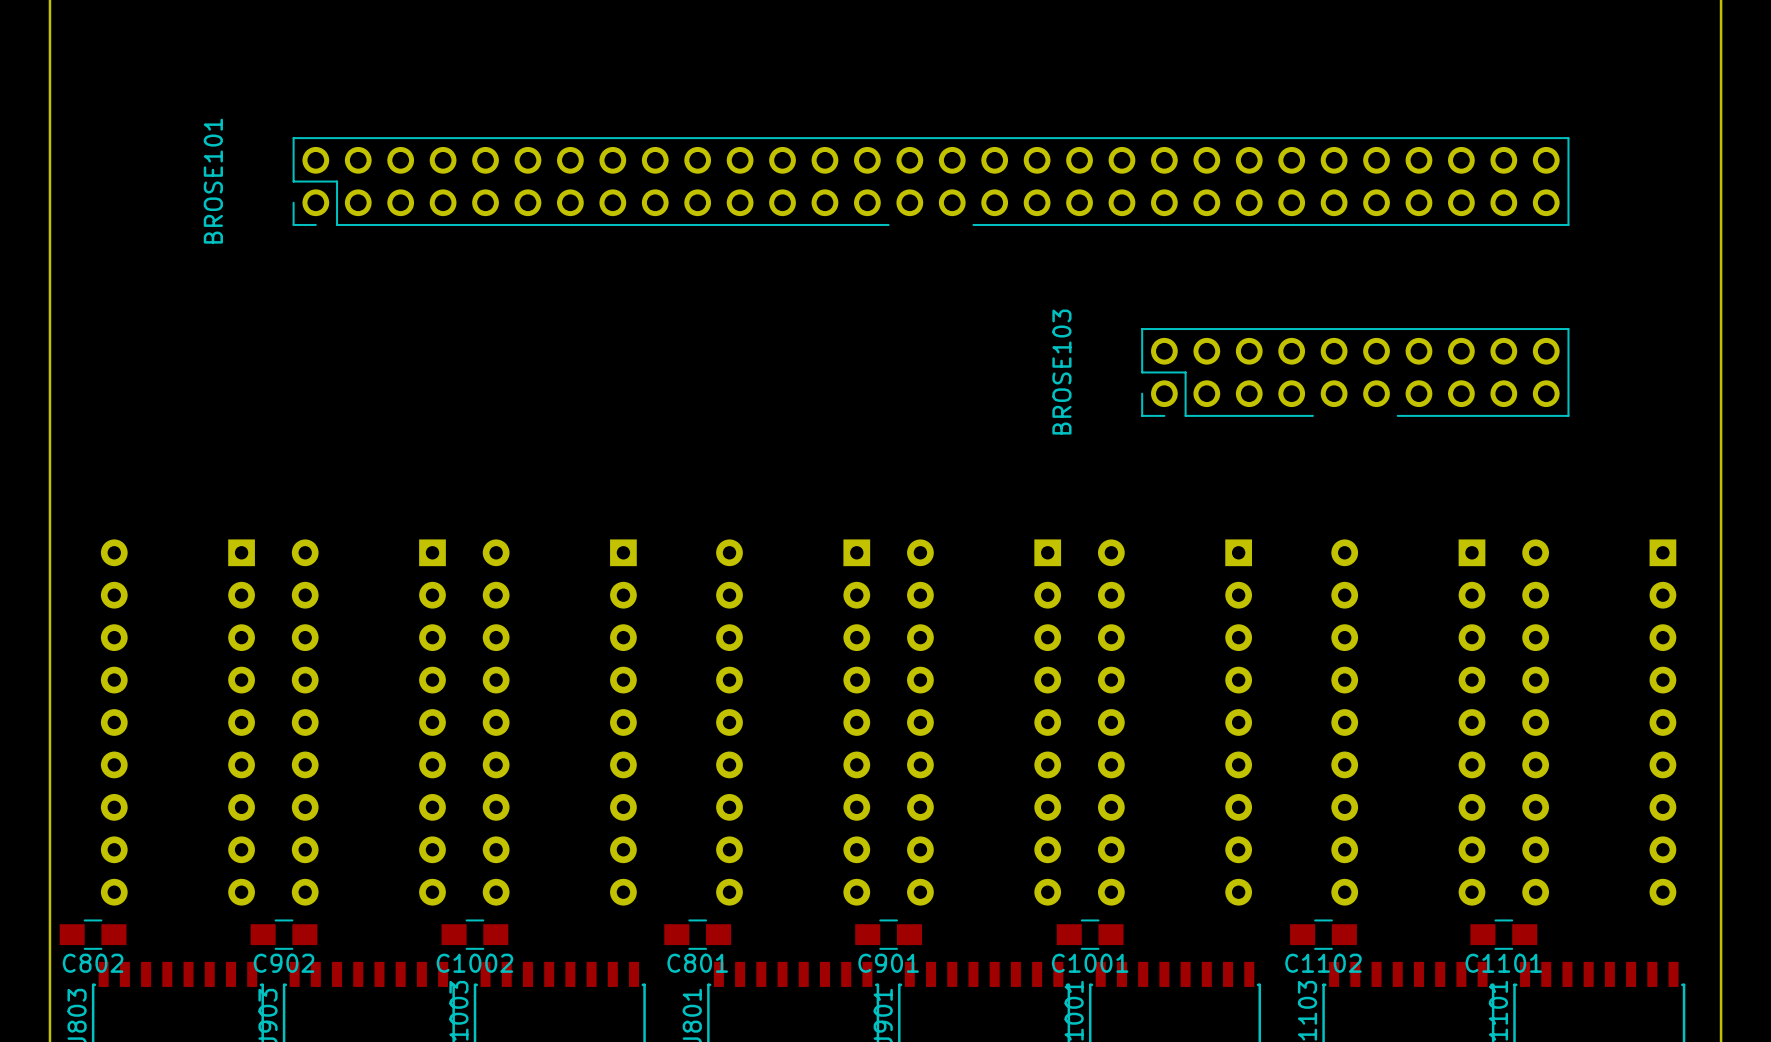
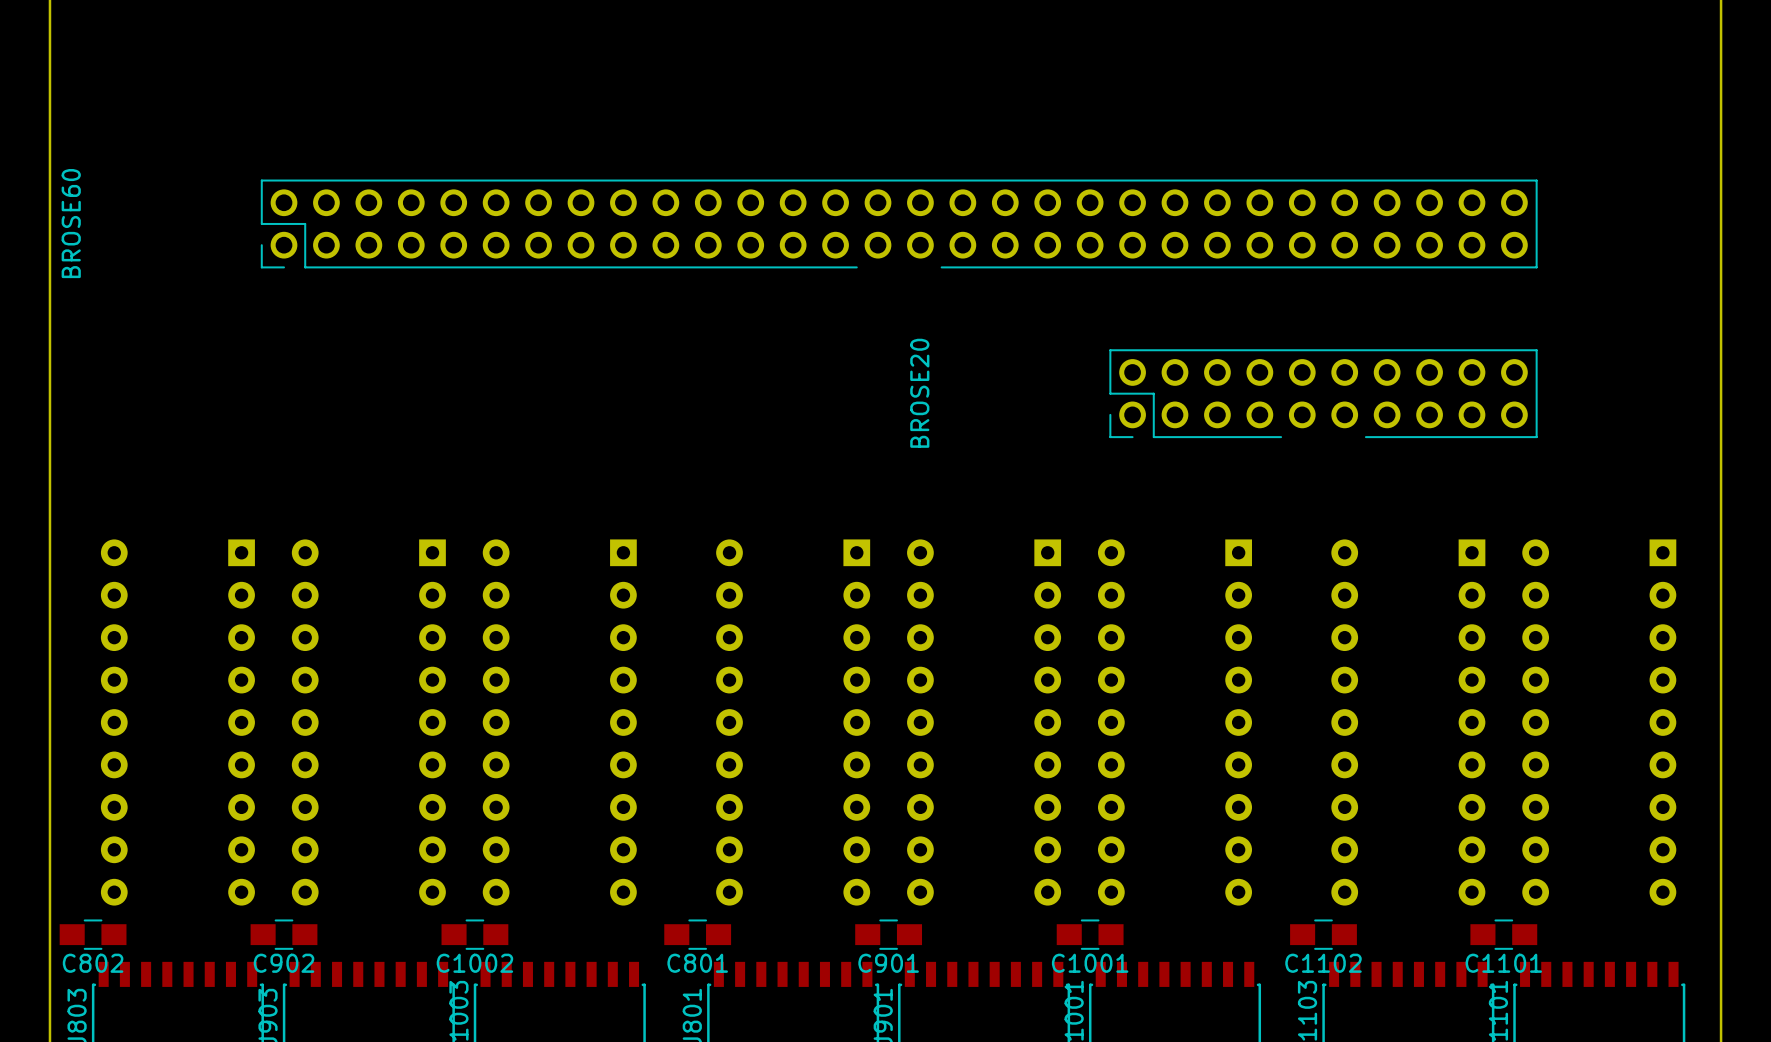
BROSE101: (931, 181) -> none
BROSE60: none -> (899, 223)
BROSE103: (1355, 372) -> none
BROSE20: none -> (1323, 393)

